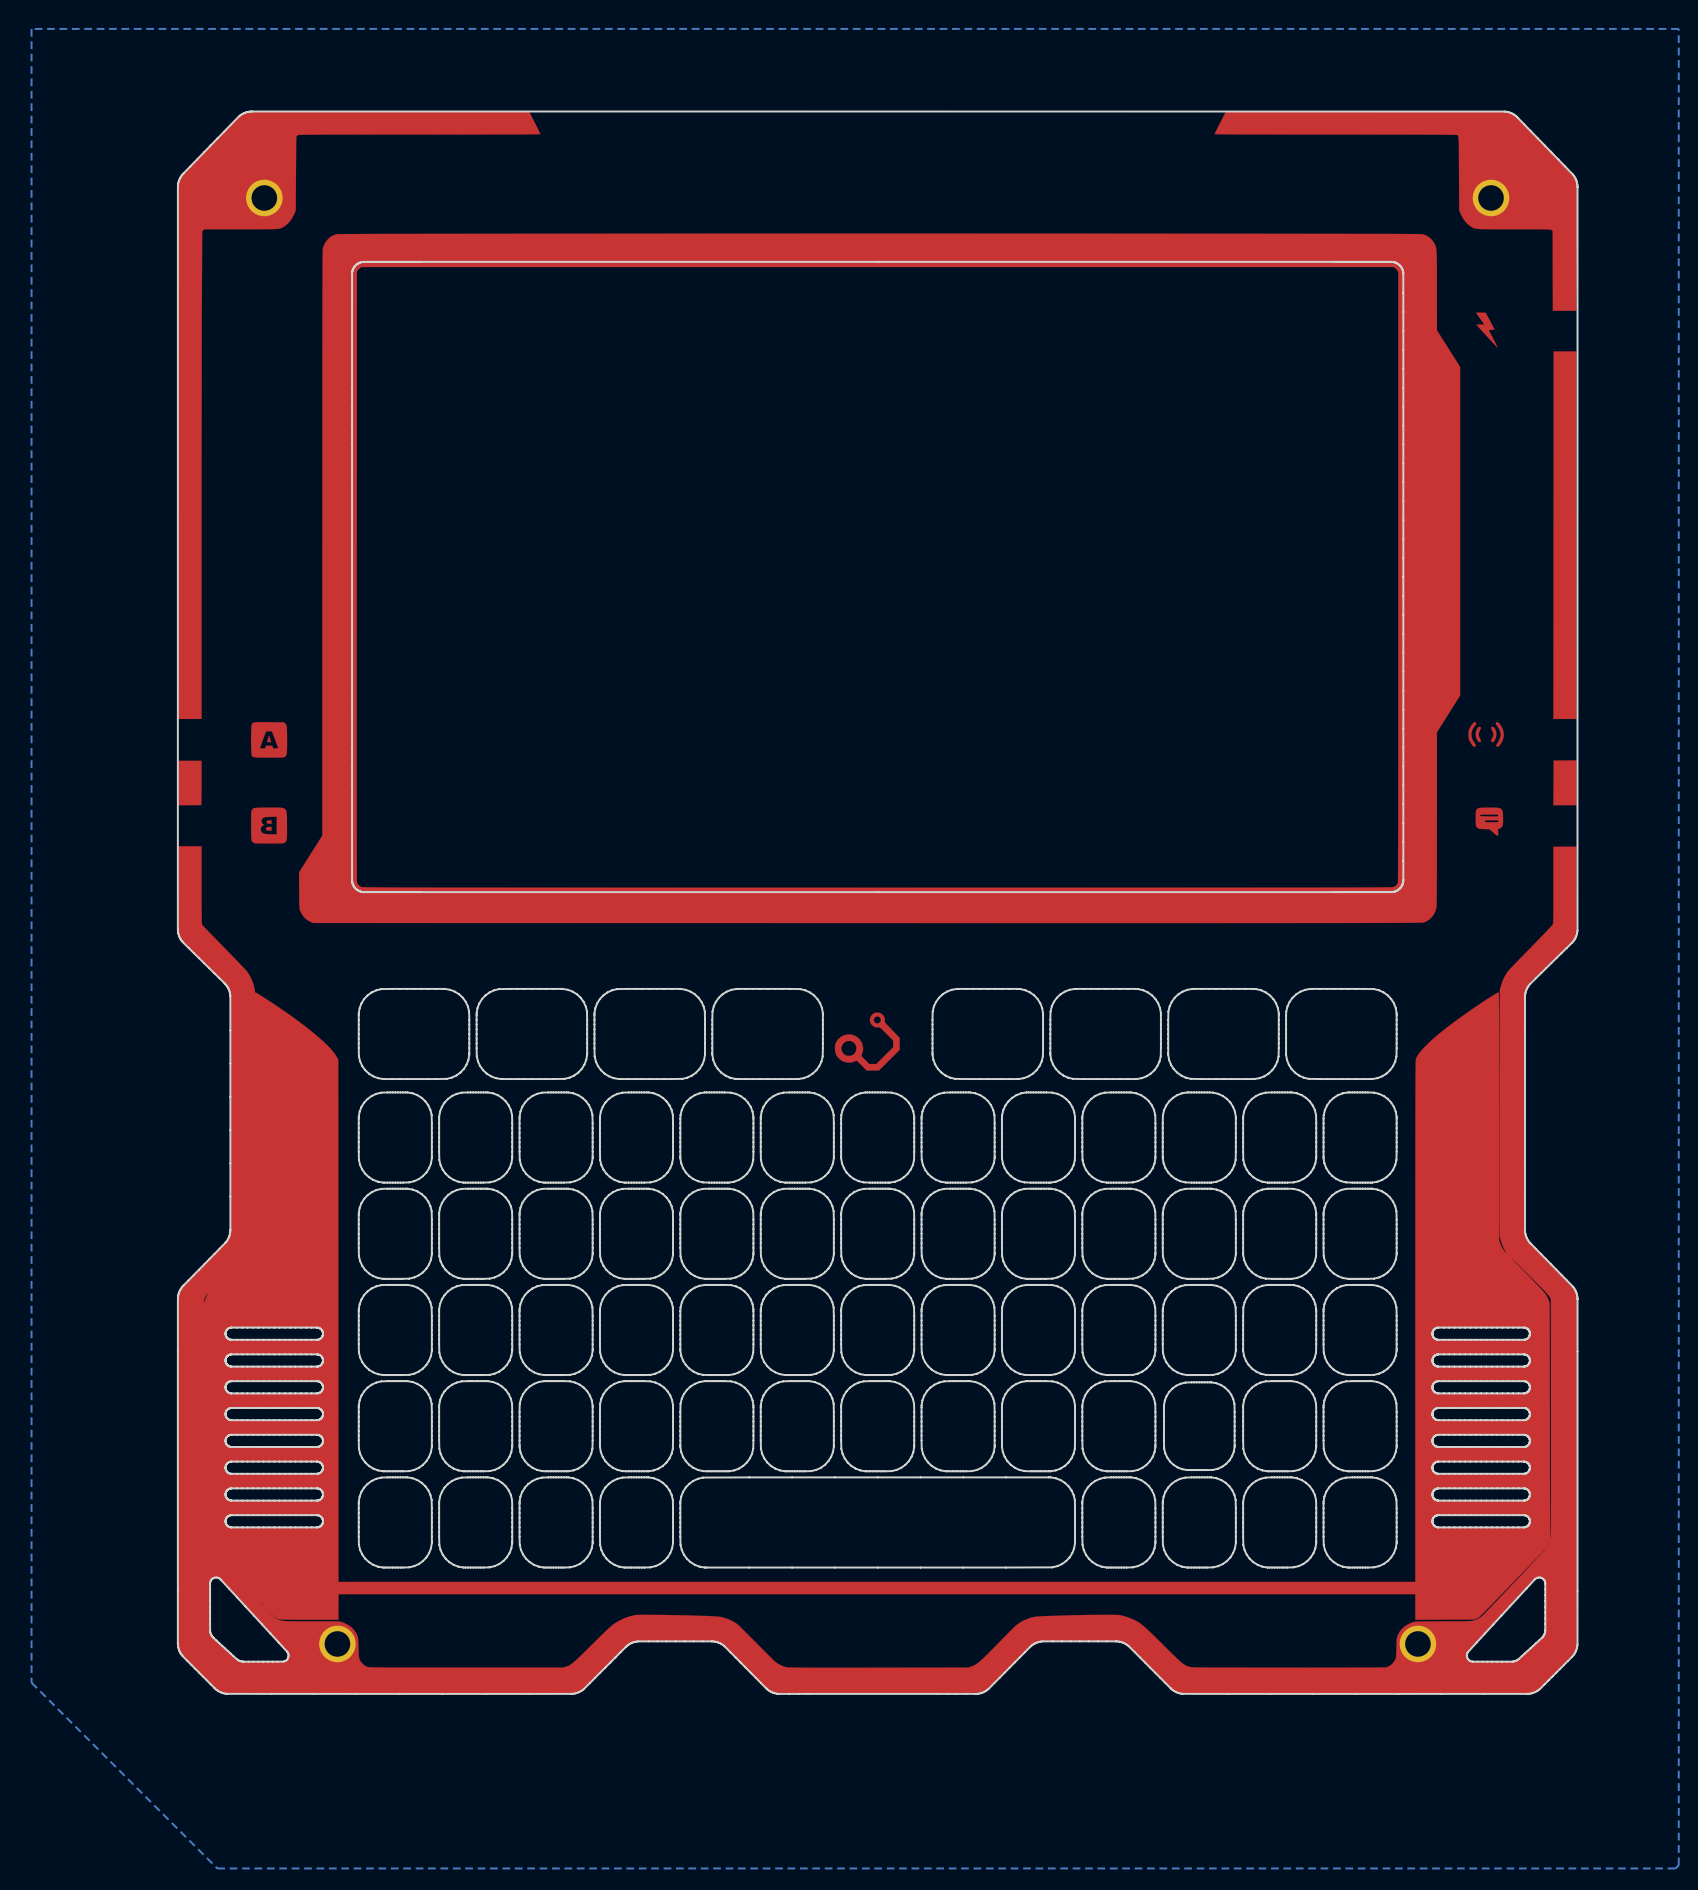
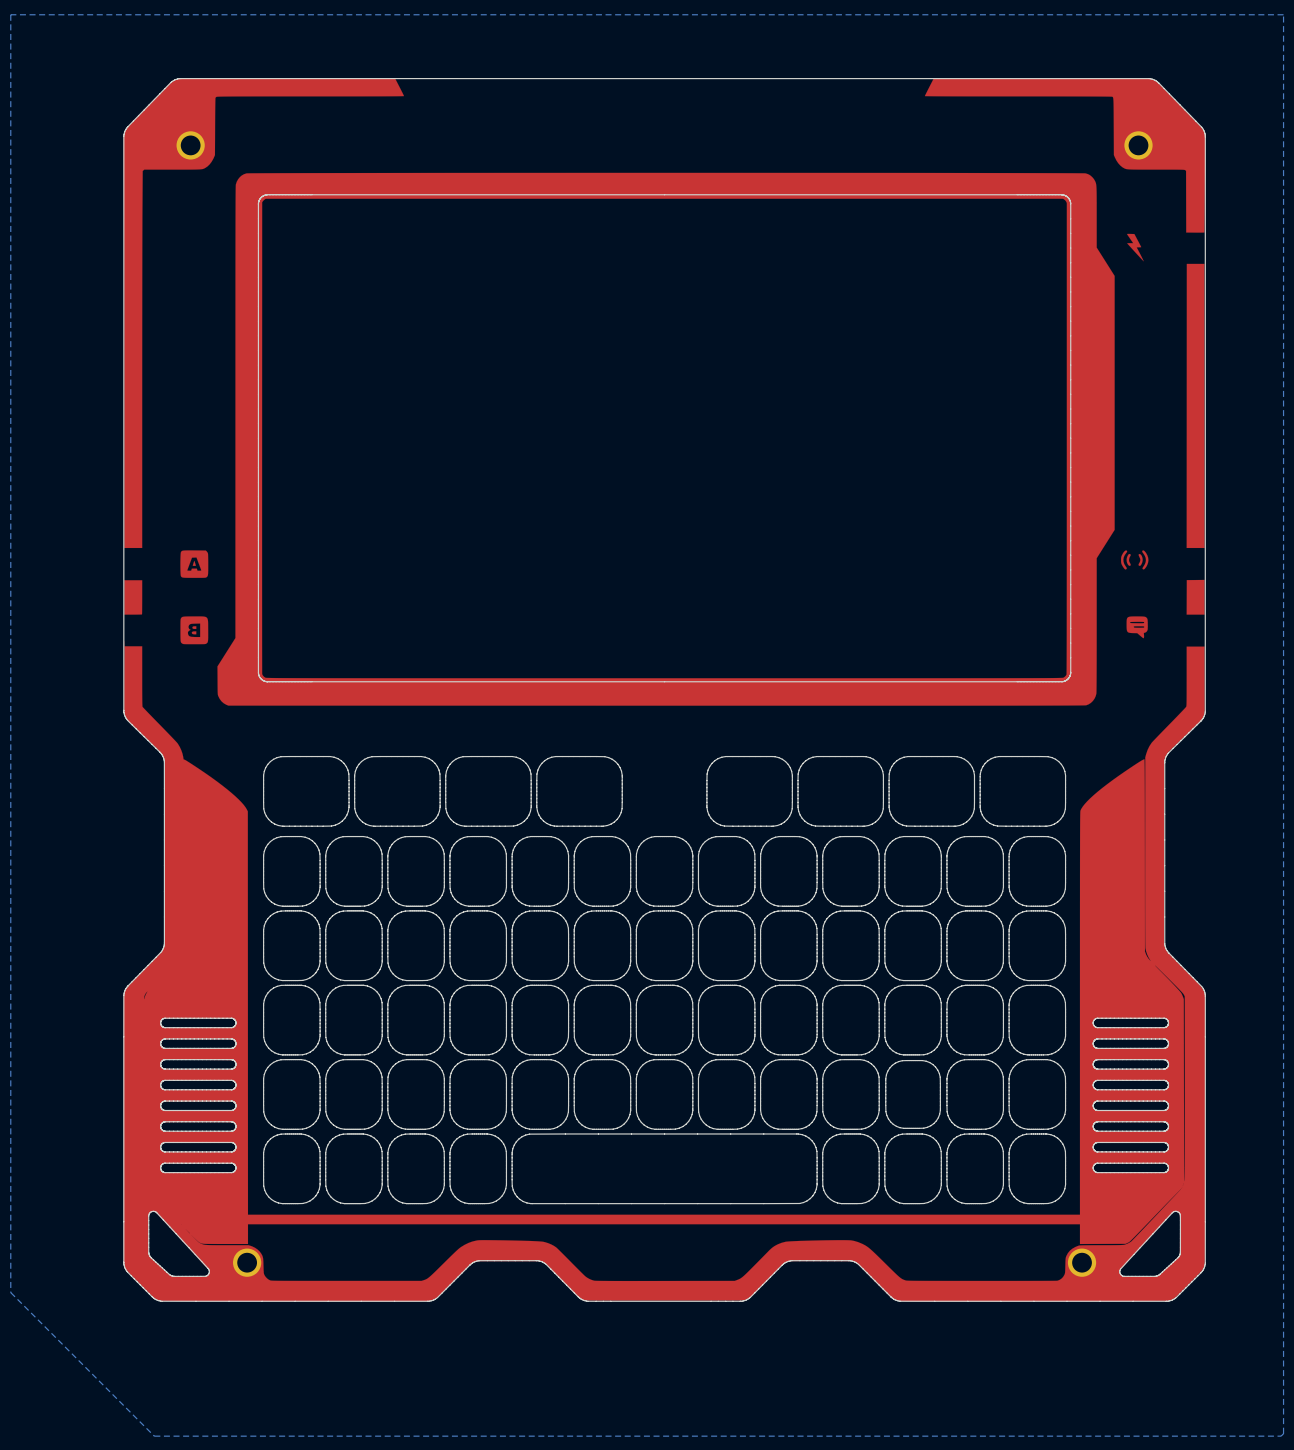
drawing shape: [177, 110, 1579, 1695] -> [123, 78, 1206, 1302]

